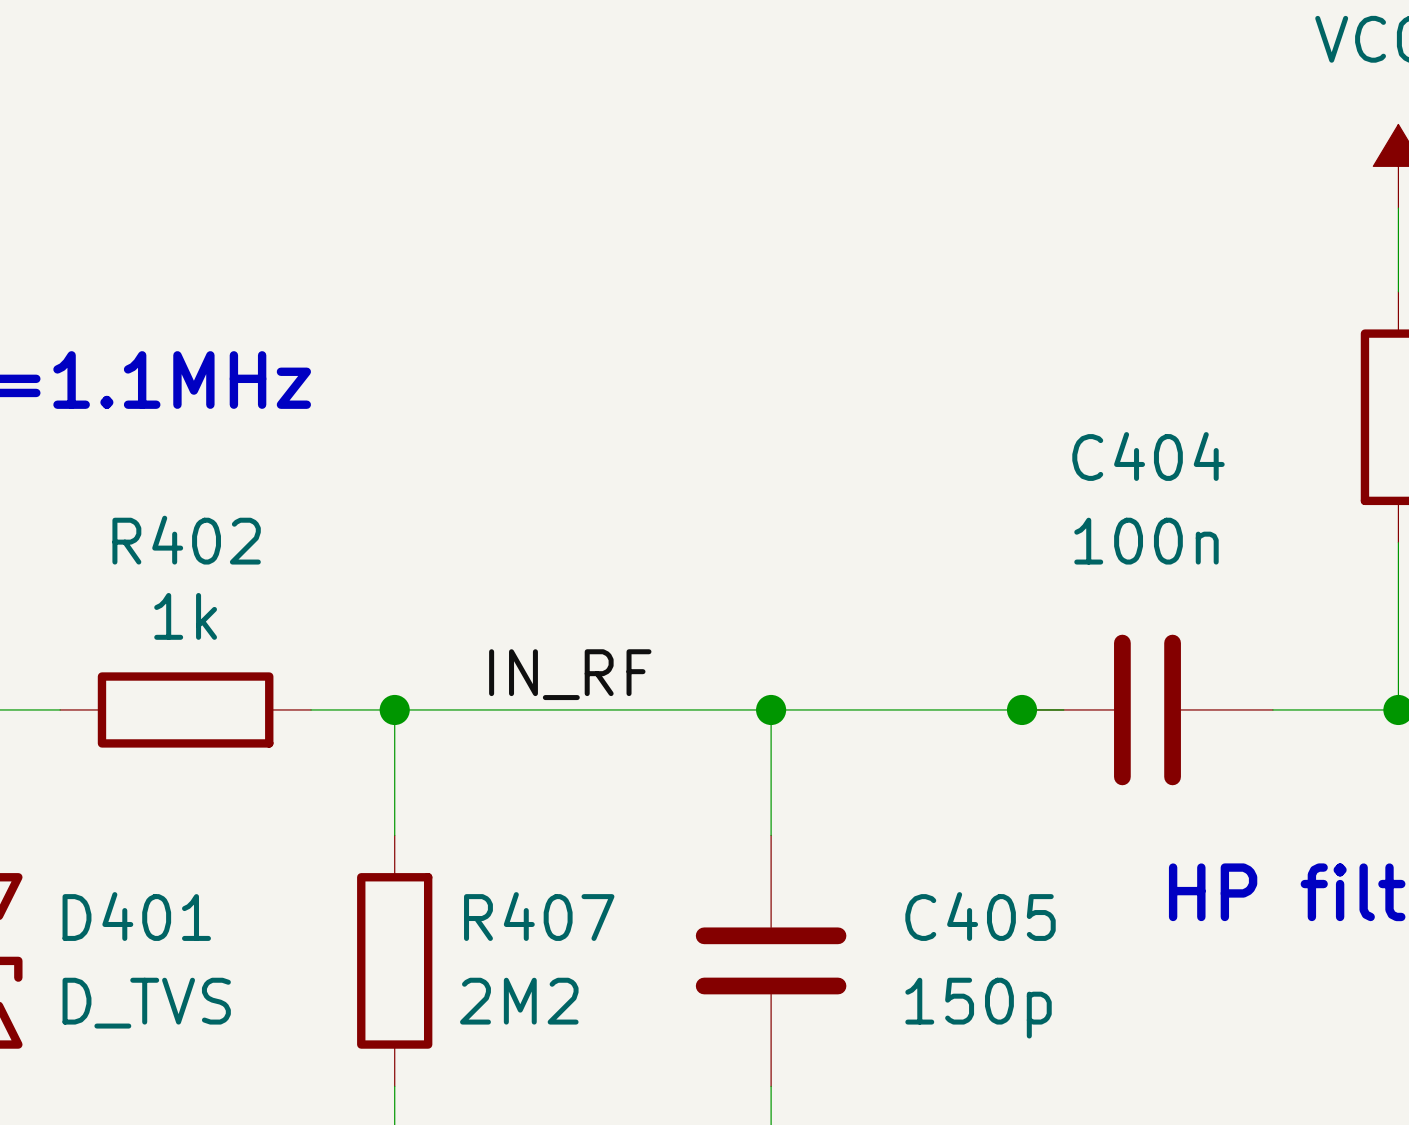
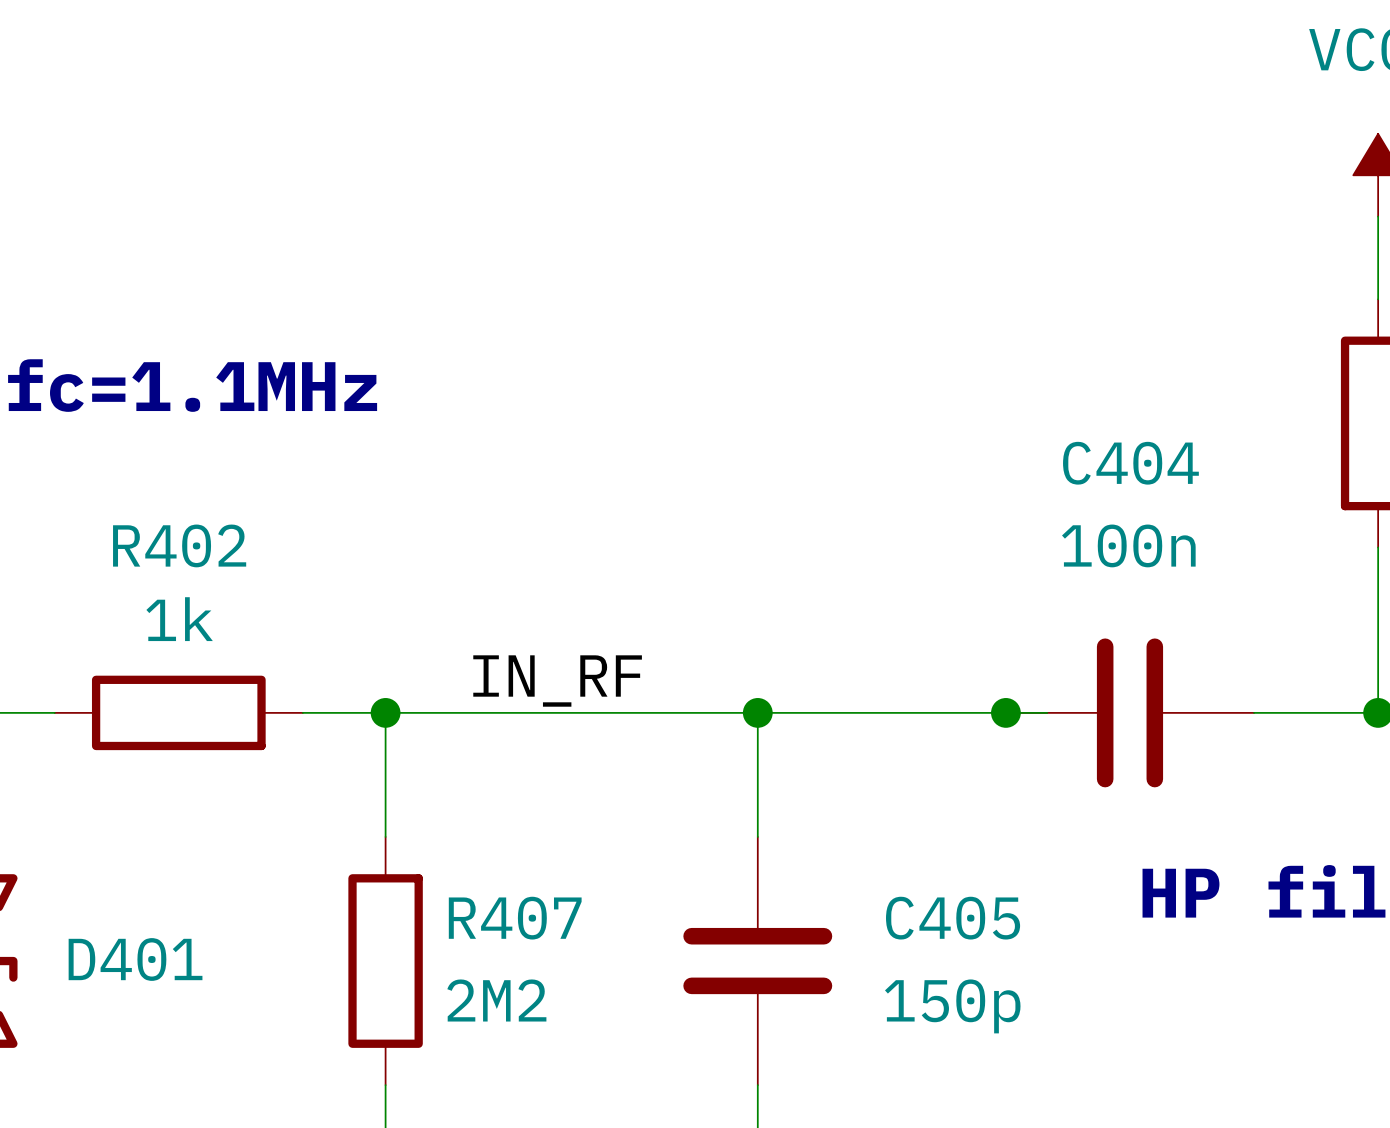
D401 name position: D401 (136, 916) -> D401 (135, 959)
D401 value: D_TVS (146, 1003) -> none

